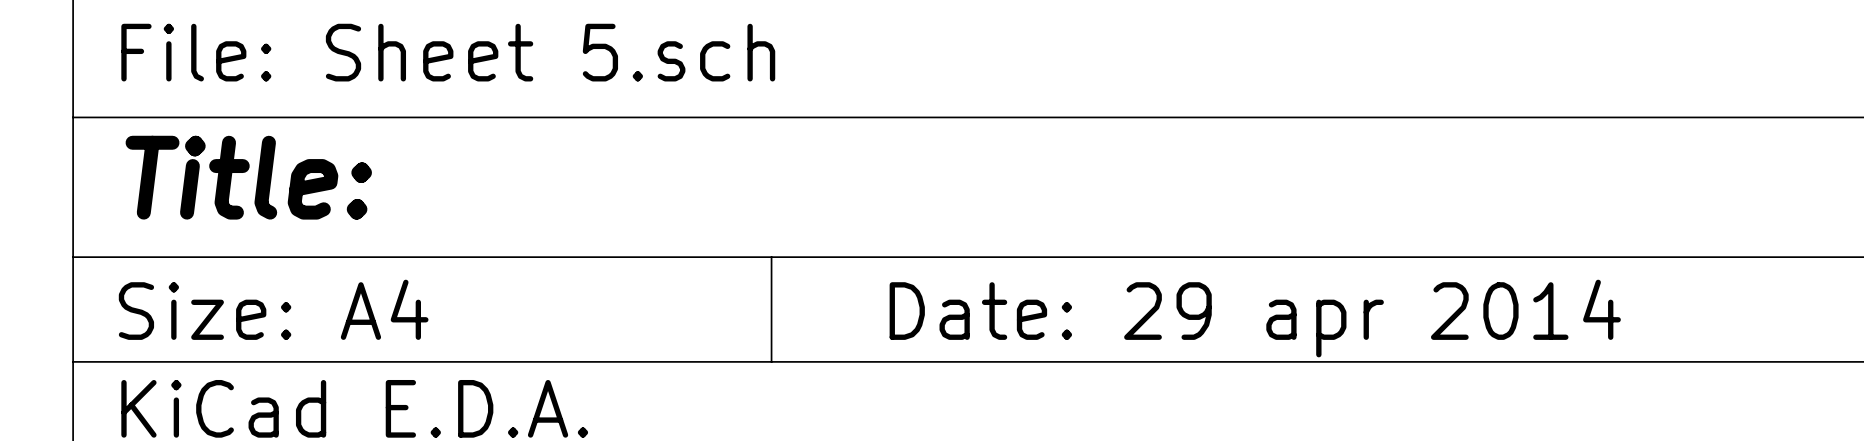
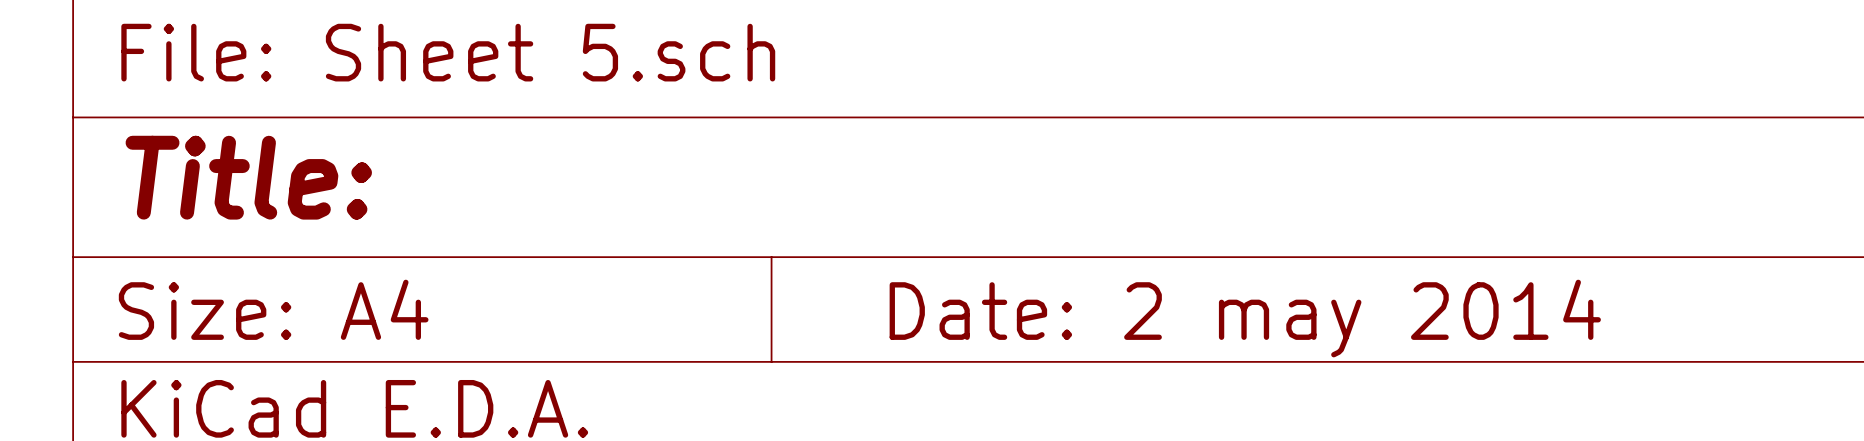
title block: Date: 29 apr 2014 (1255, 318) -> Date: 2 may 2014 (1245, 318)

